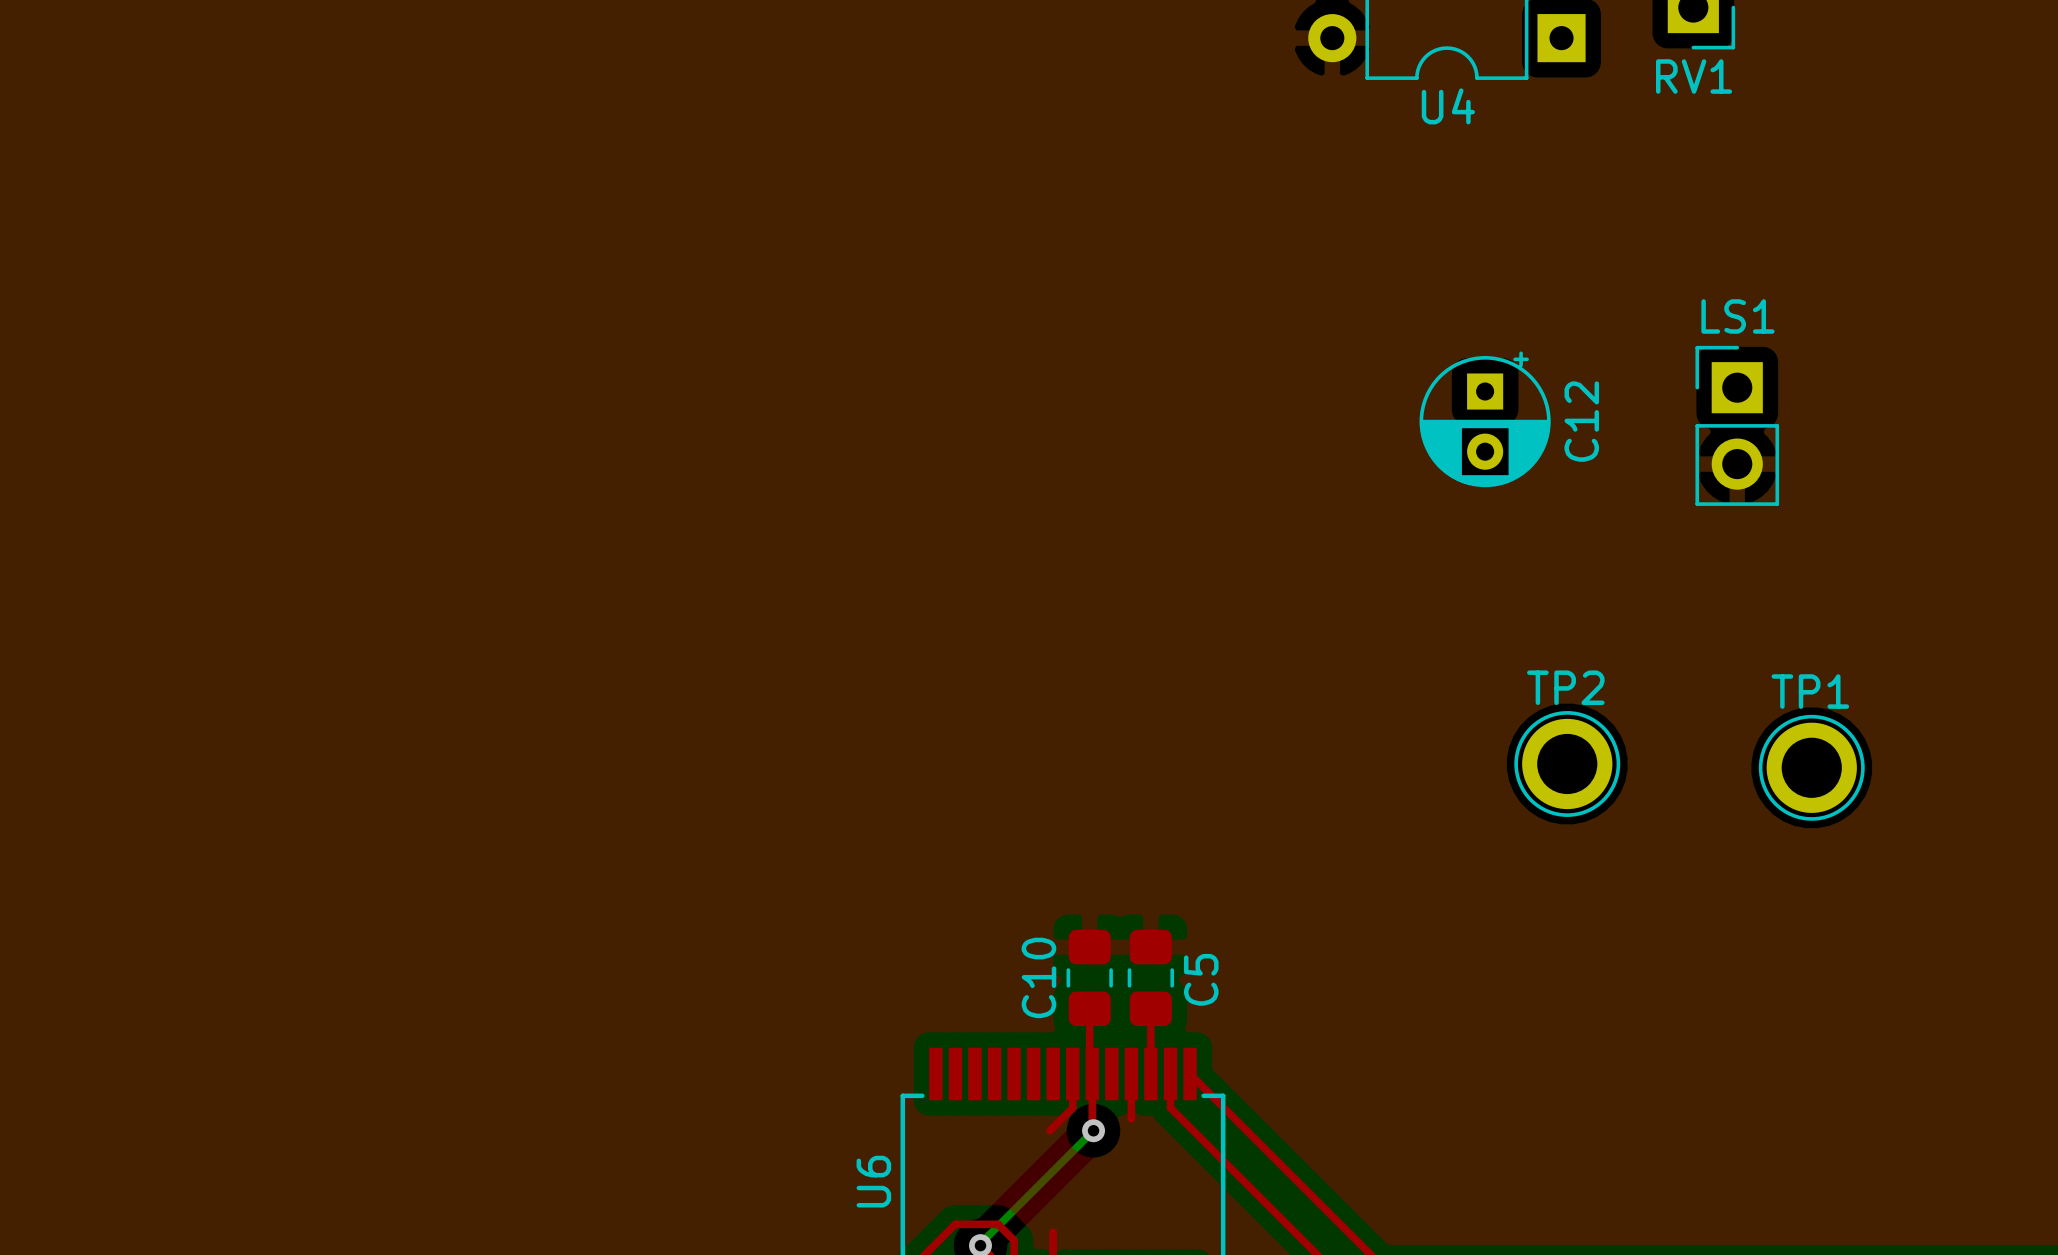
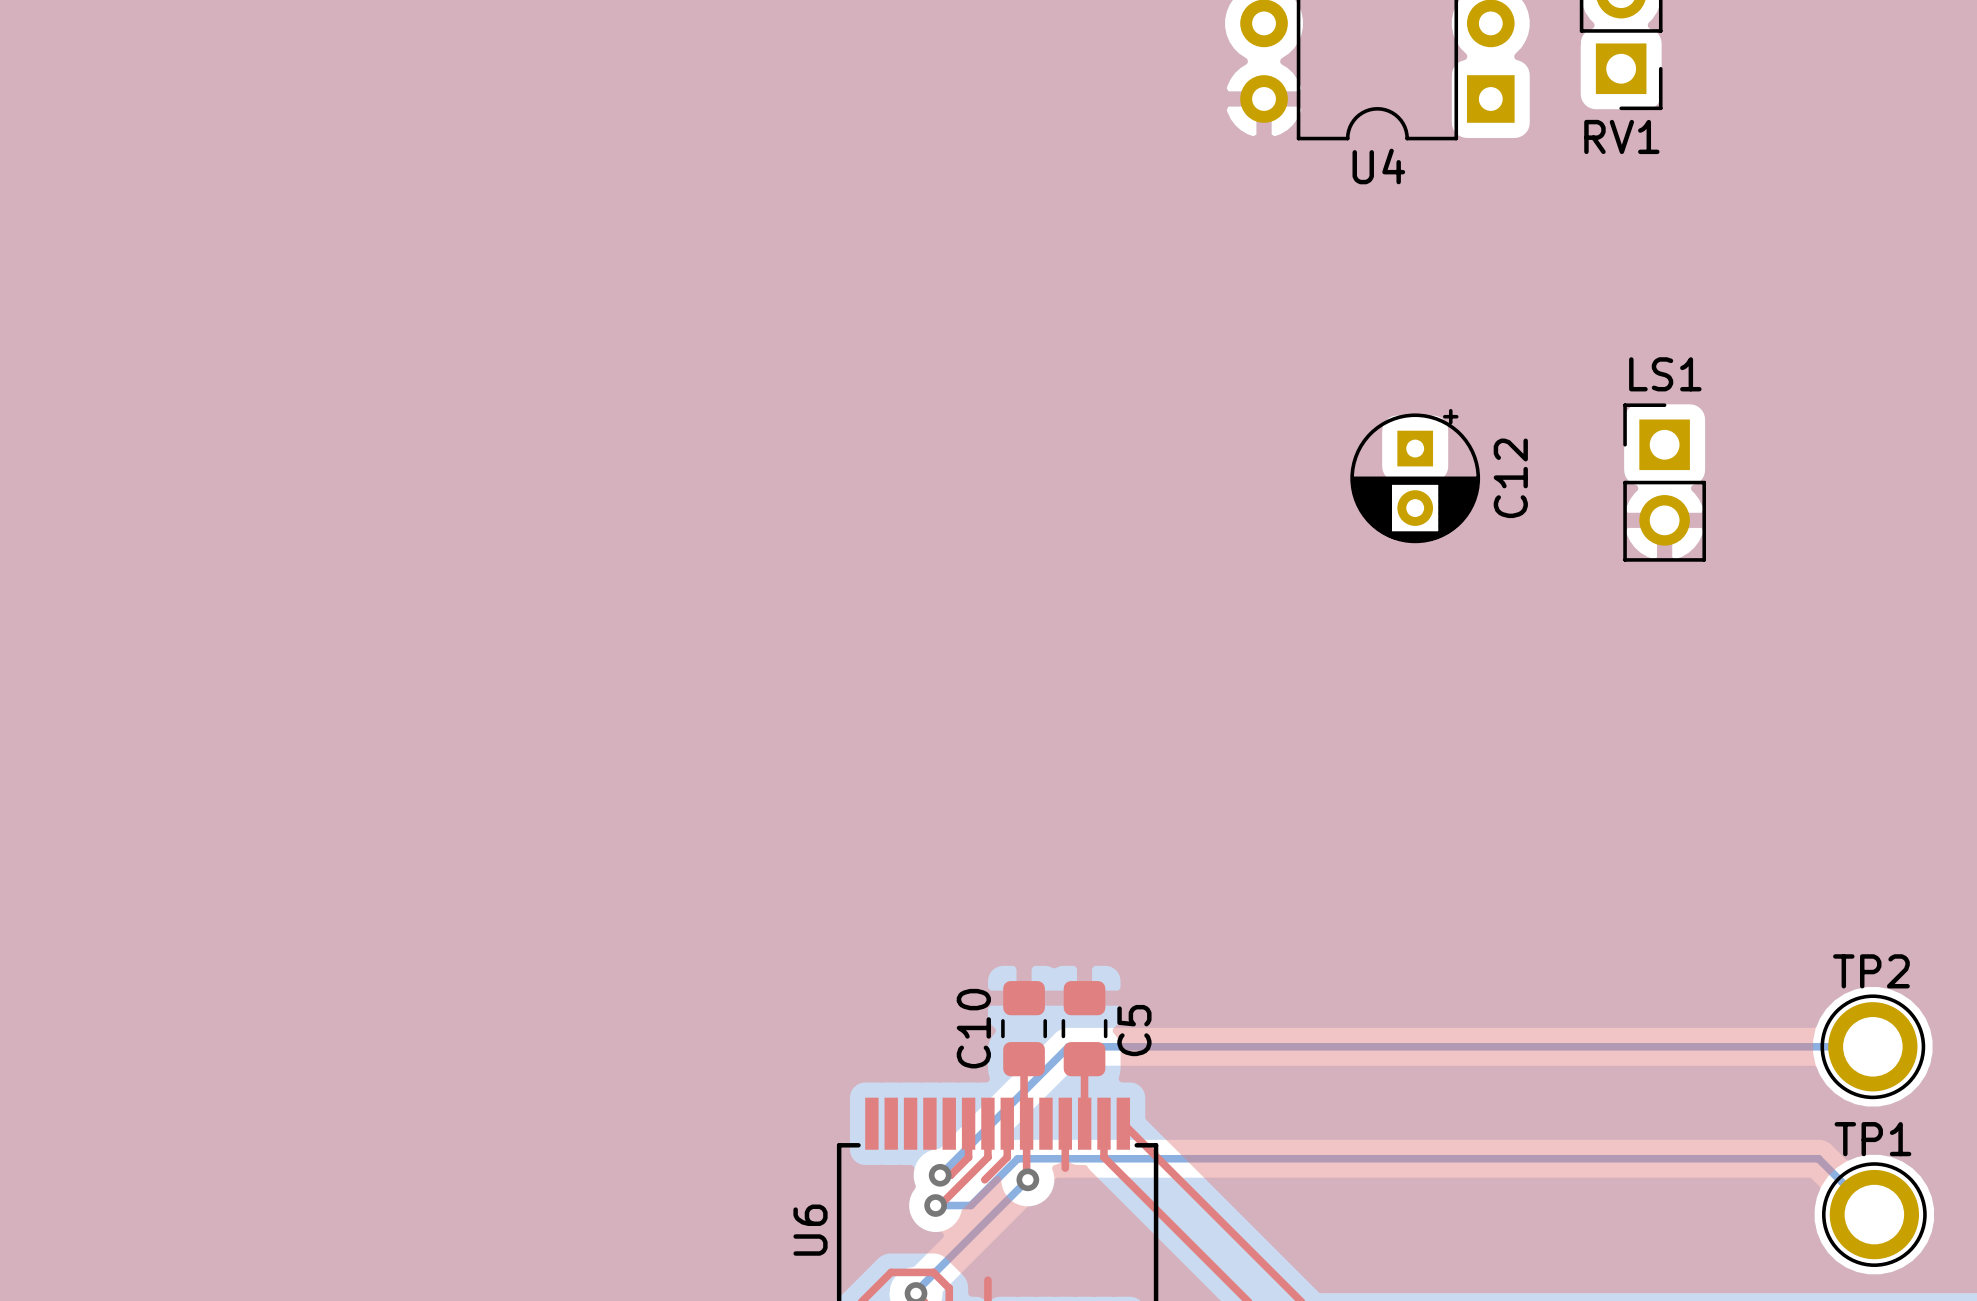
TP2 position: (1567, 763) -> (1872, 1046)
TP1 position: (1811, 767) -> (1874, 1214)
bottom track: none -> (1872, 1046) (1068, 1046) (940, 1175)
top track: none -> (968, 1123) (968, 1157) (950, 1175) (940, 1175)
top track: none -> (987, 1123) (987, 1157) (939, 1205) (935, 1205)
via: none -> (940, 1175)
bottom track: none -> (935, 1205) (970, 1205) (1017, 1158) (1818, 1158) (1874, 1214)
via: none -> (935, 1205)

